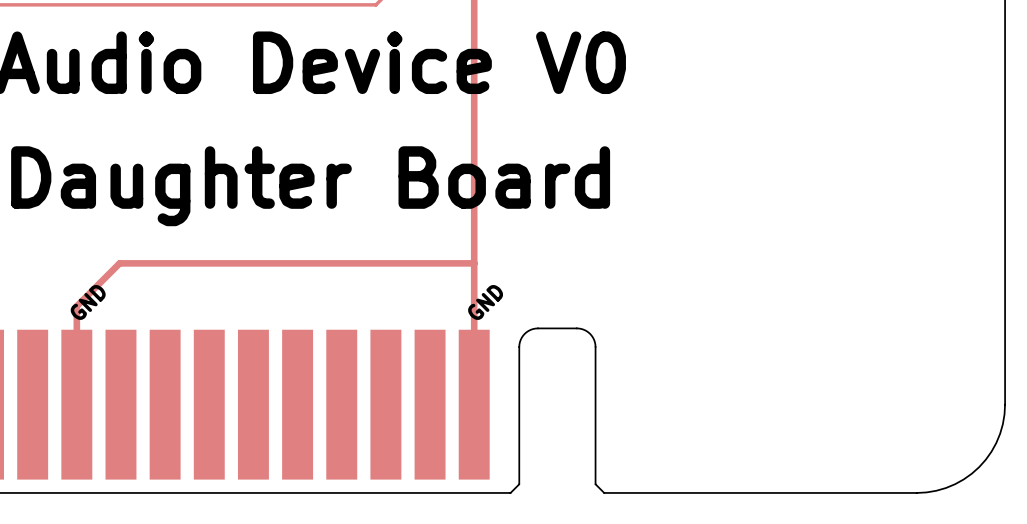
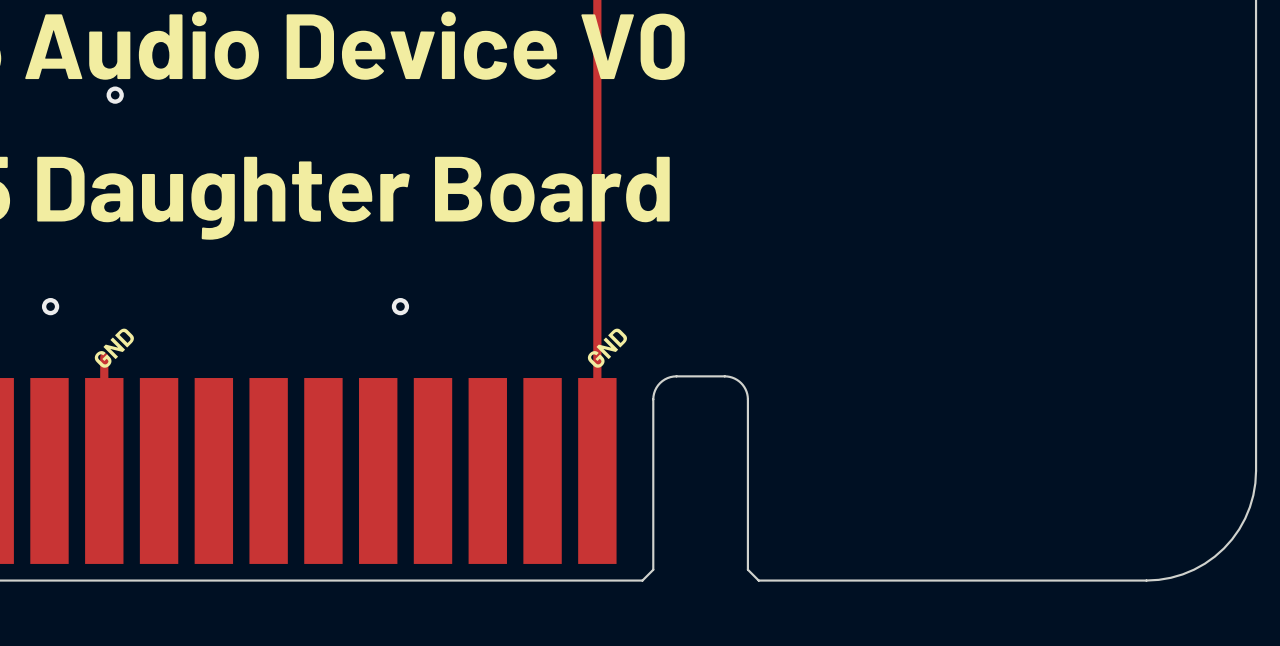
via: none -> (115, 95)
track: (474, 263) (119, 263) (76, 306) (76, 312) -> none
via: none -> (50, 306)
via: none -> (400, 306)

